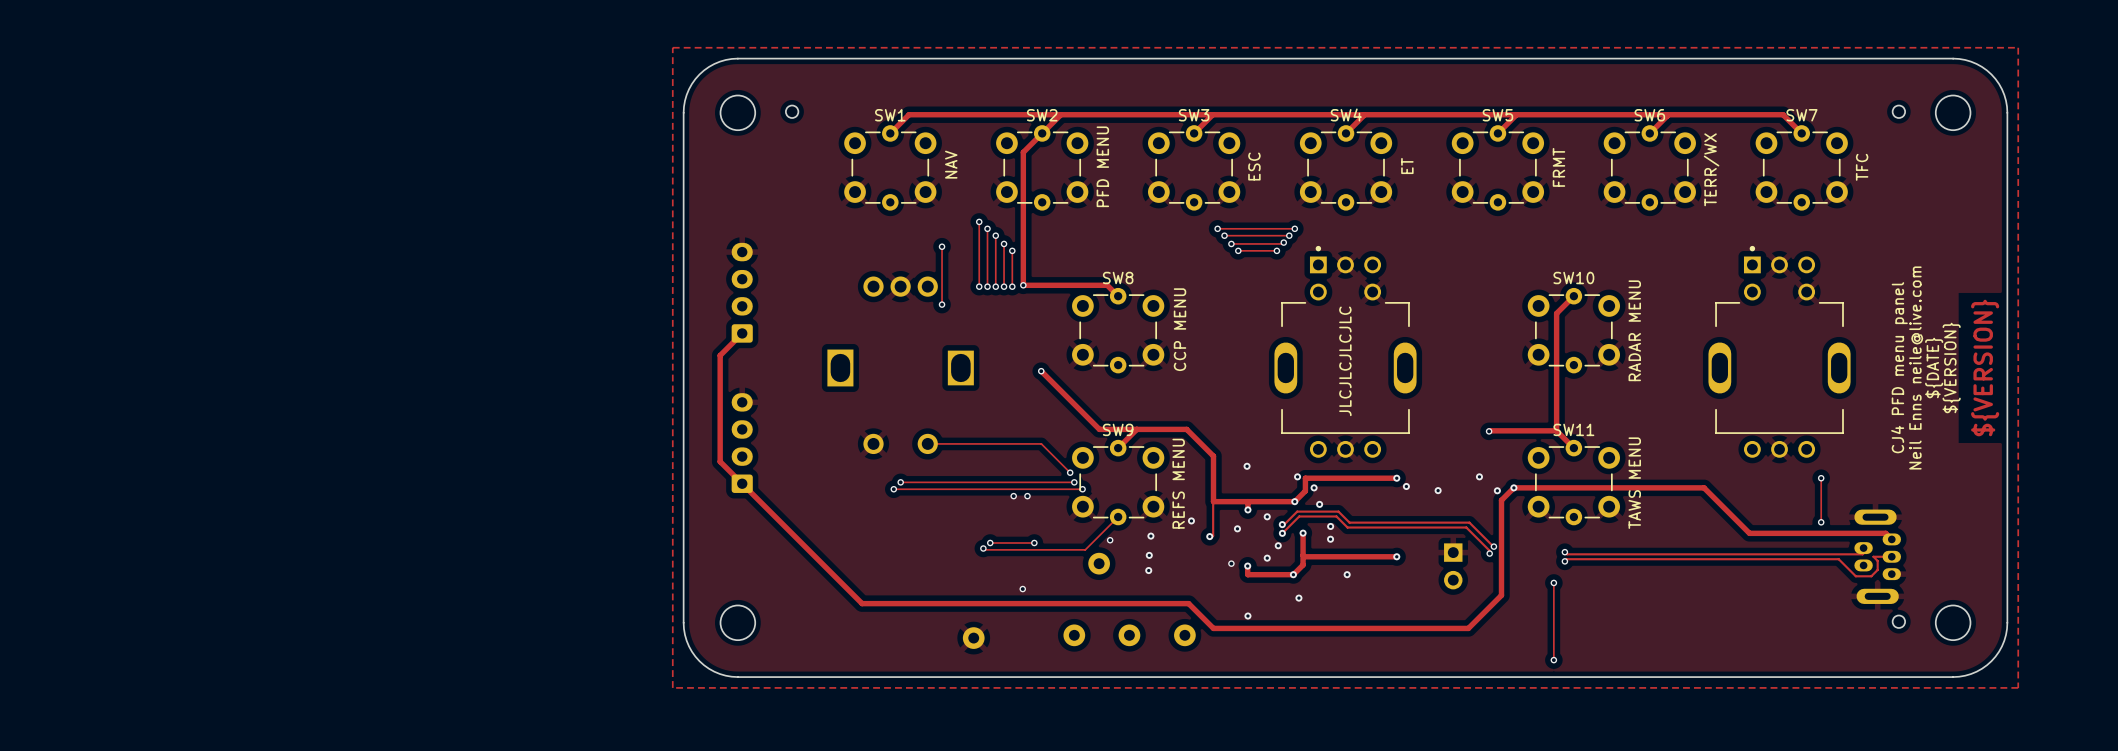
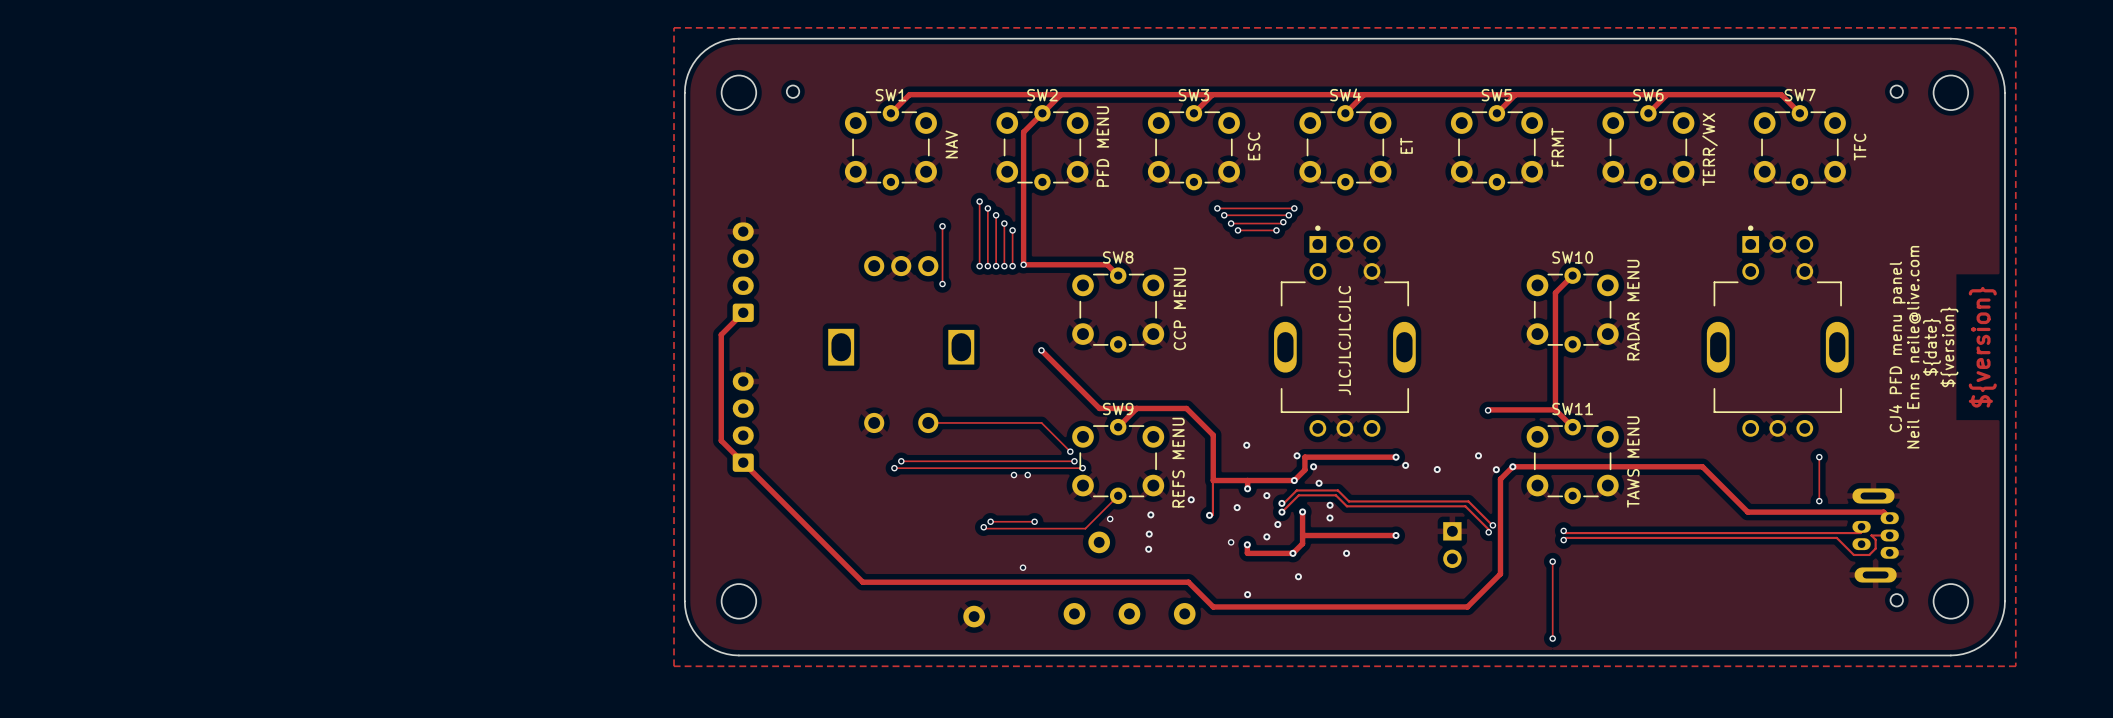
text: ${DATE} (1934, 367) -> ${date} (1931, 347)
text: ${VERSION} (1951, 367) -> ${version} (1949, 347)
text: ${VERSION} (1985, 367) -> ${version} (1982, 347)

